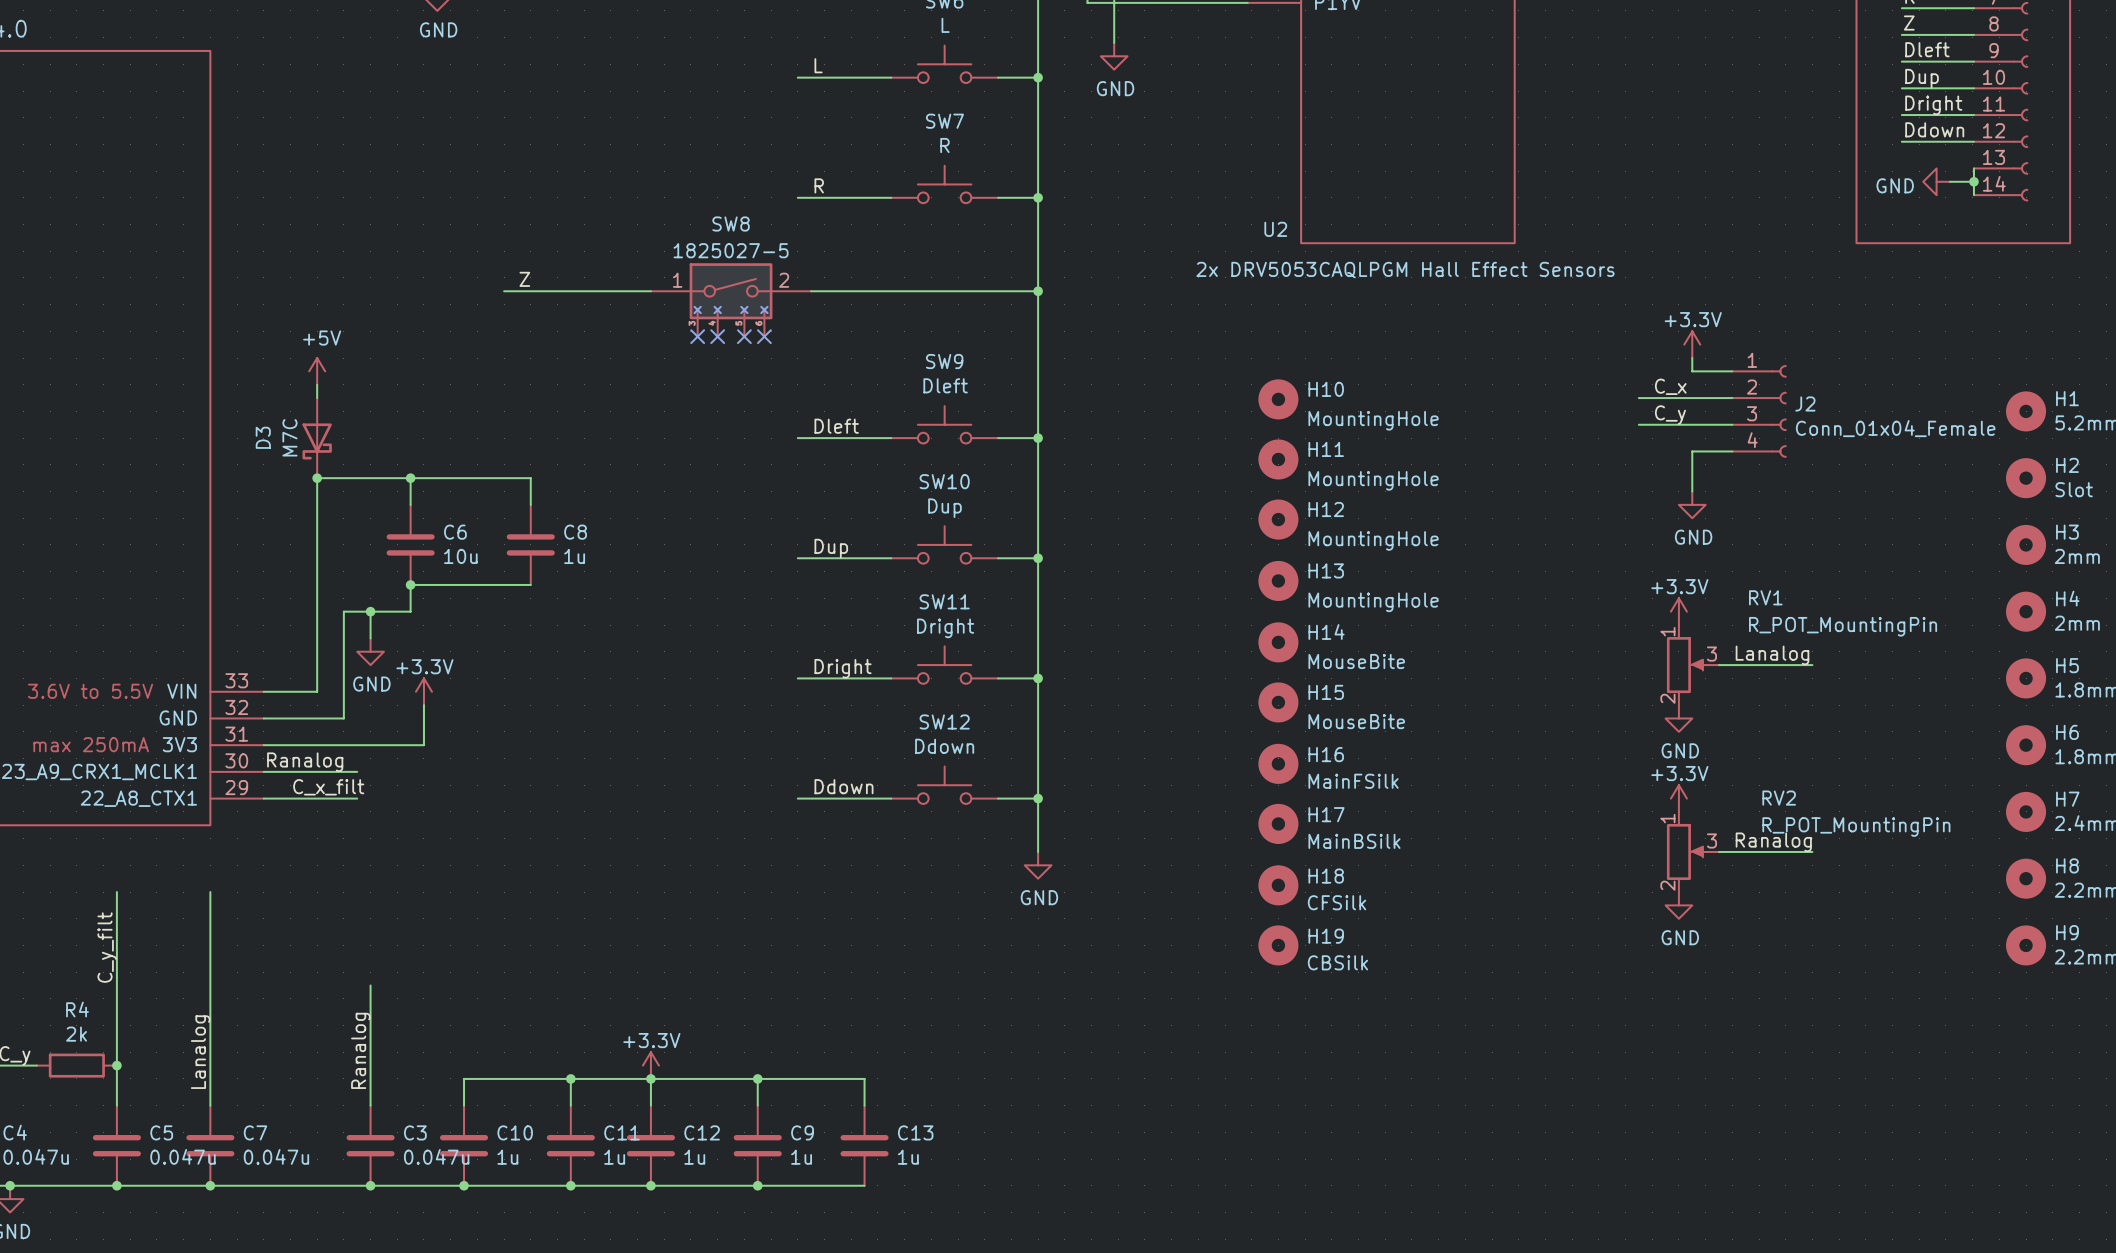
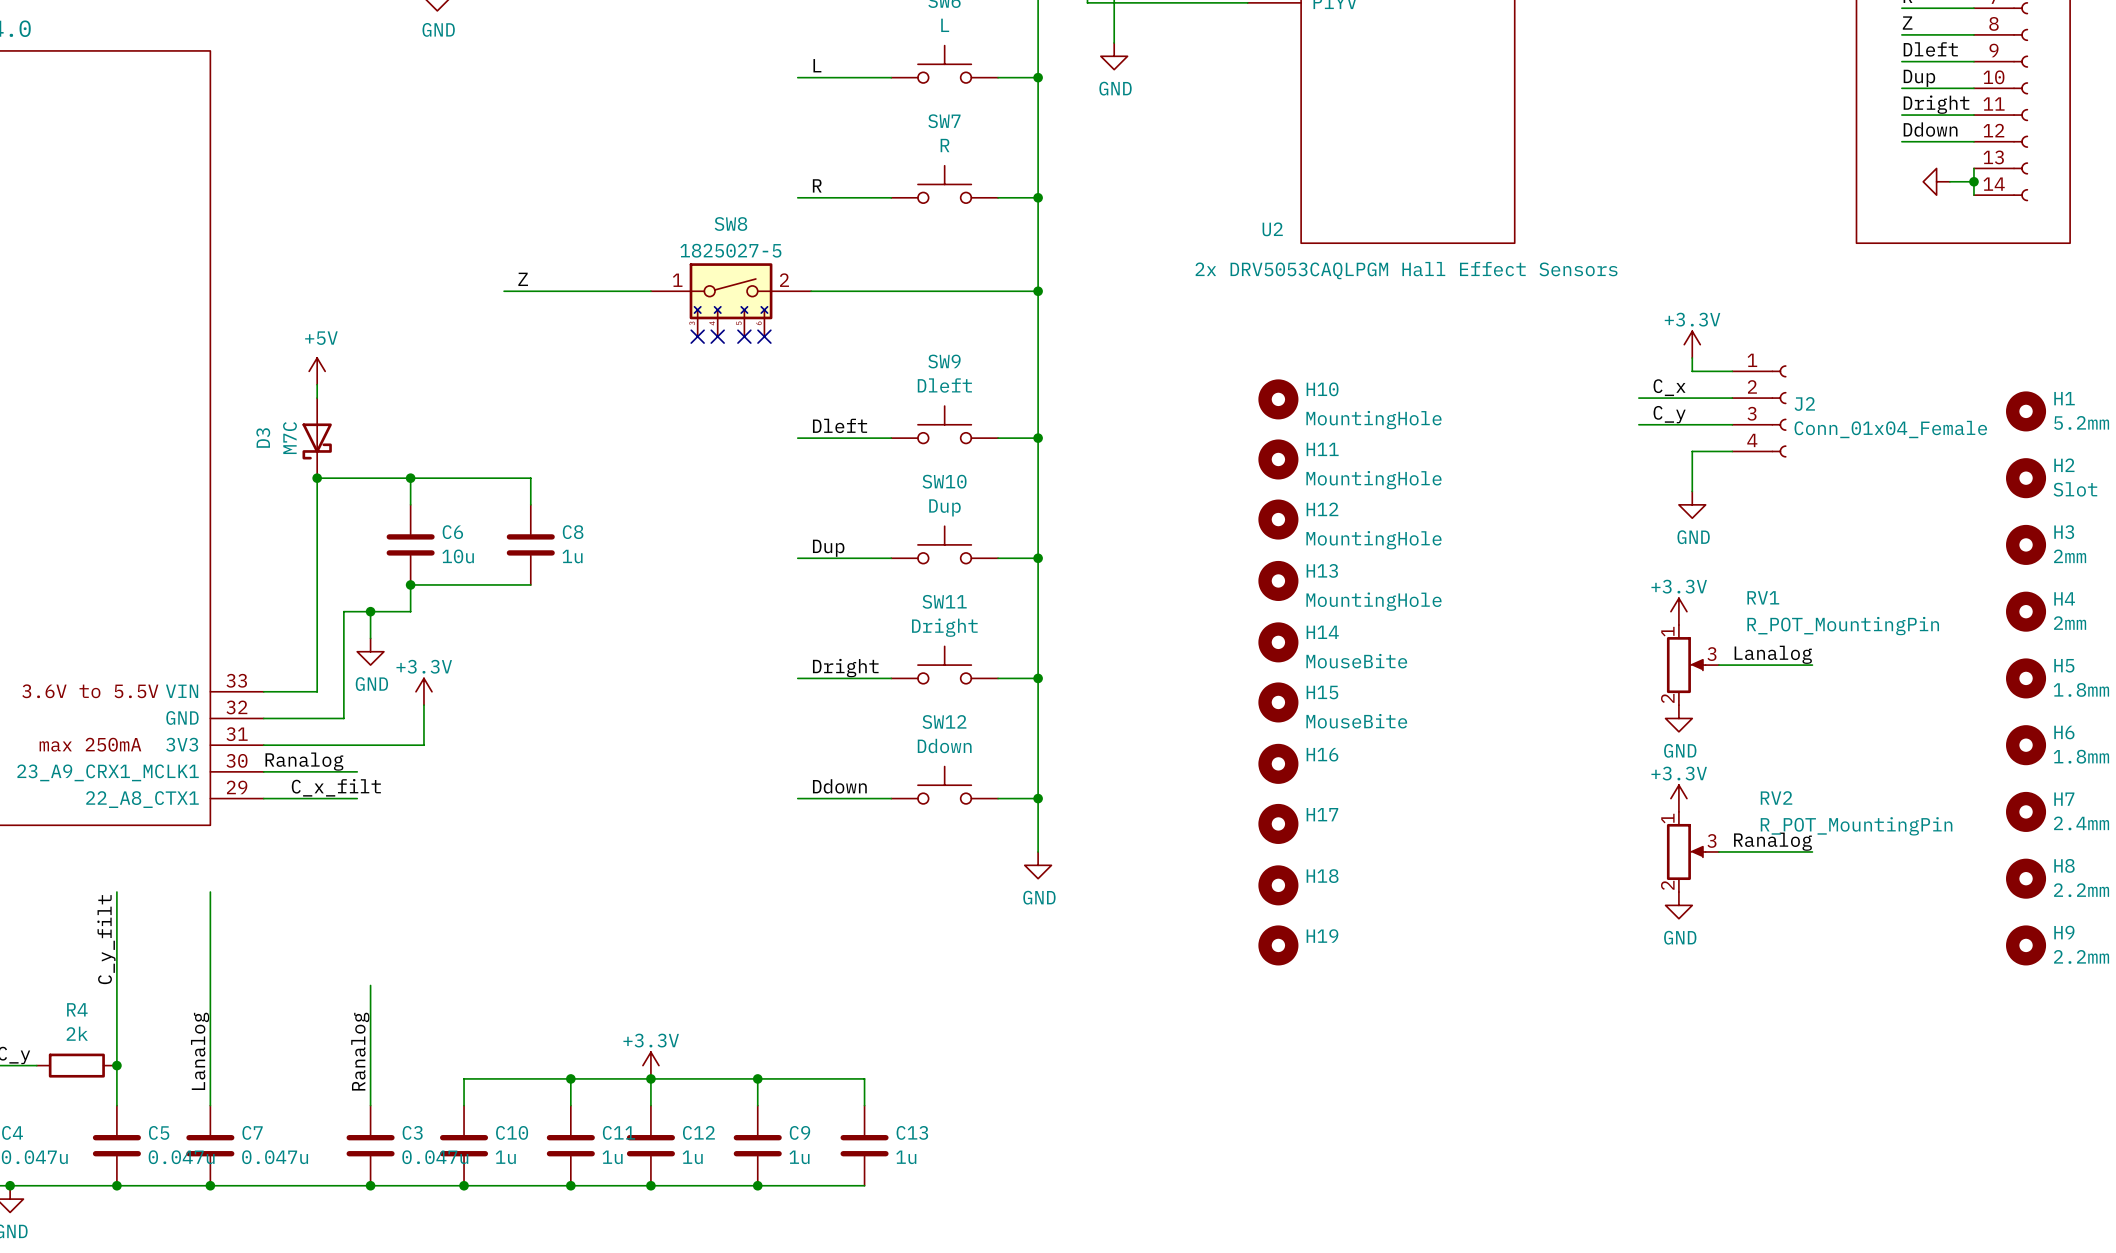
power symbol text: GND (1895, 185) -> none
H16 value: MainFSilk (1353, 781) -> none
H17 value: MainBSilk (1354, 841) -> none
H18 value: CFSilk (1337, 902) -> none
H19 value: CBSilk (1337, 962) -> none

